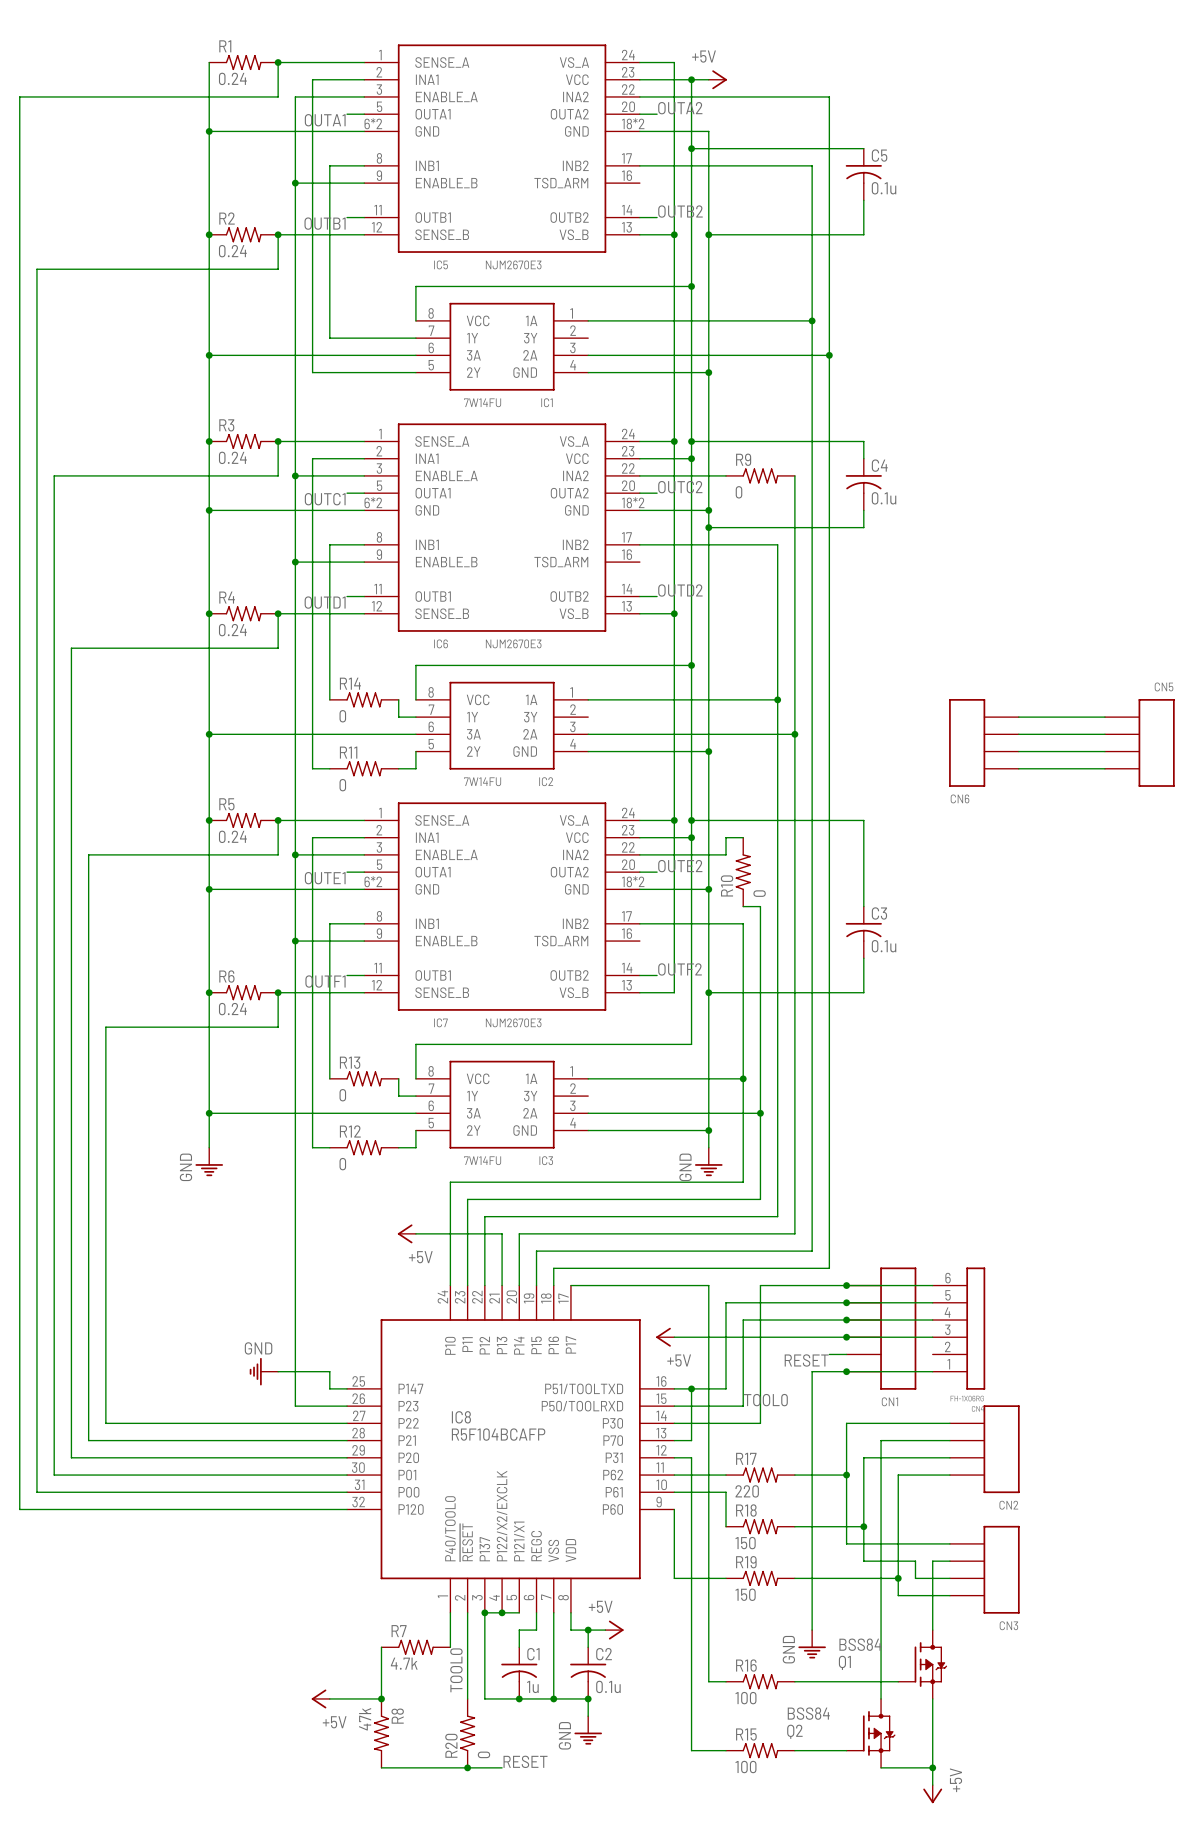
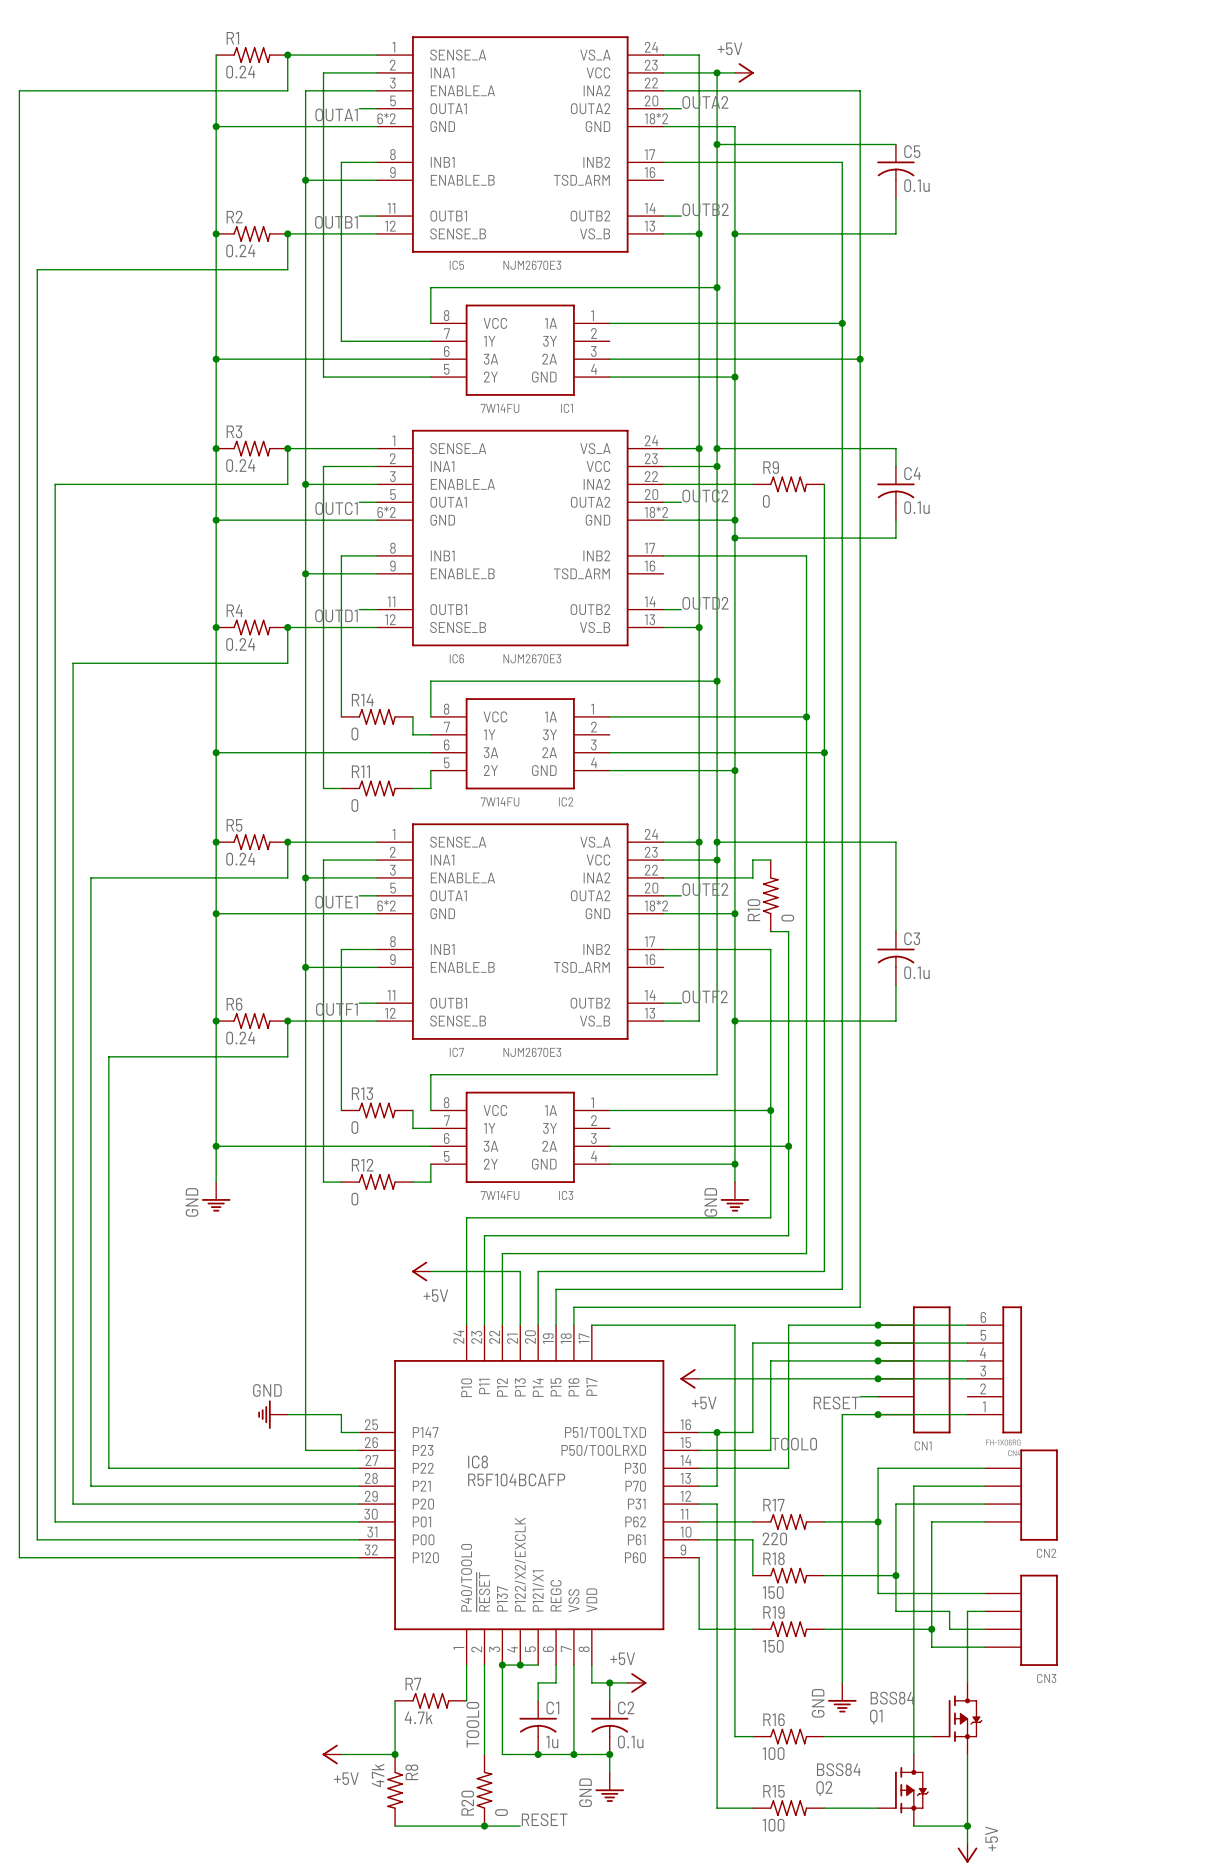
wire: (1018, 717) (1104, 717) -> none
wire: (1018, 734) (1104, 734) -> none
CN6: (983, 742) -> none
CN5: (1139, 742) -> none
wire: (1018, 751) (1104, 751) -> none
wire: (1018, 768) (1104, 768) -> none

